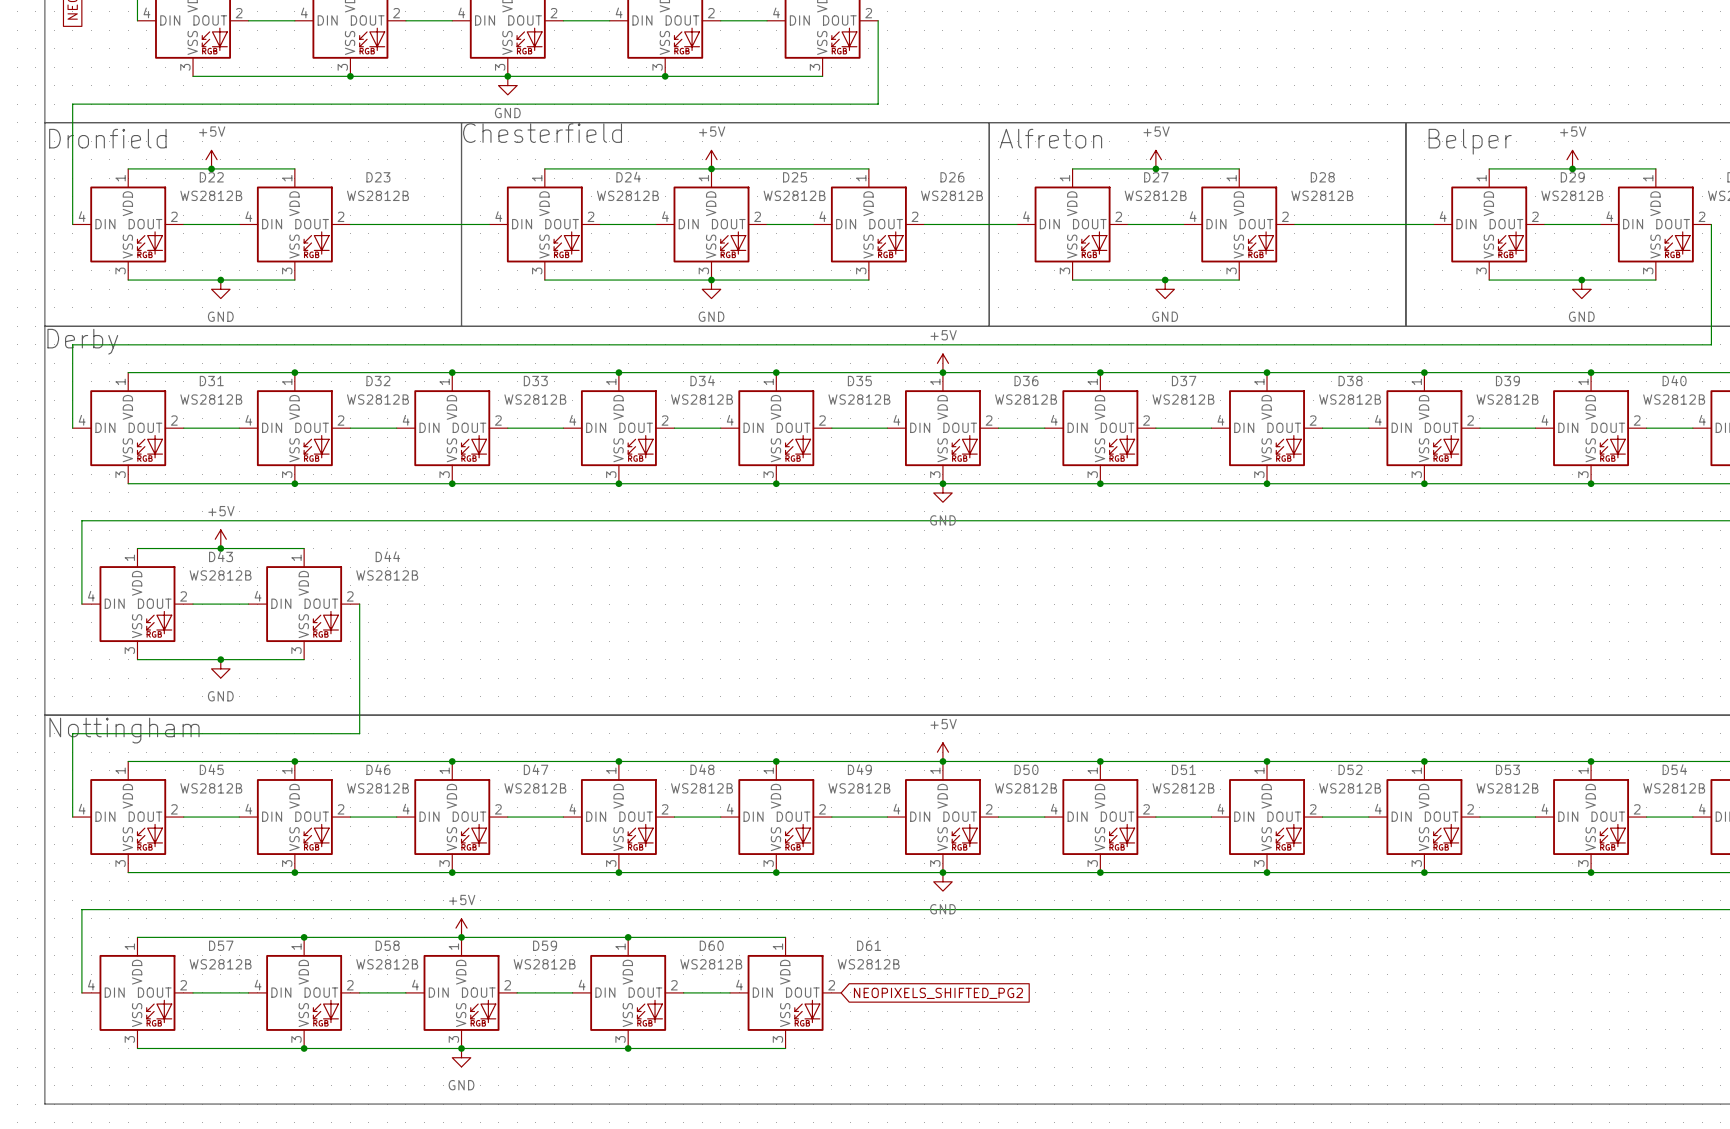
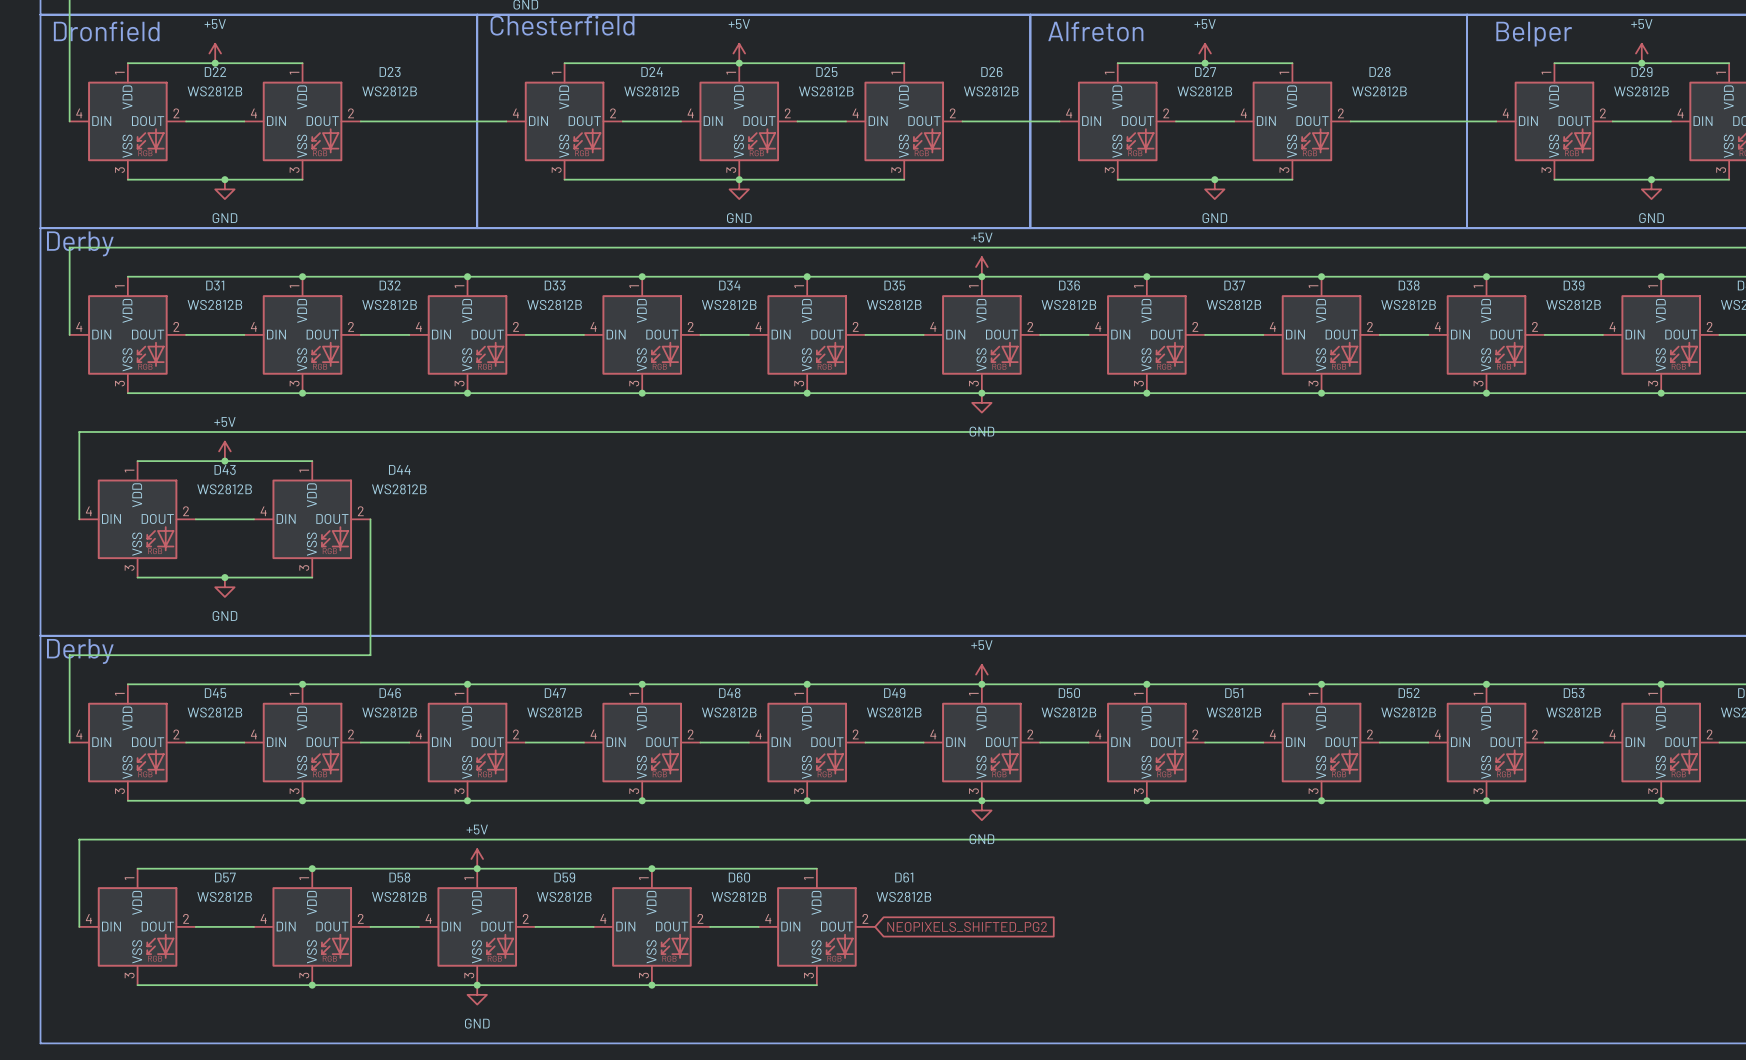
text: none -> Derby (80, 651)
text: Nottingham (124, 730) -> none

